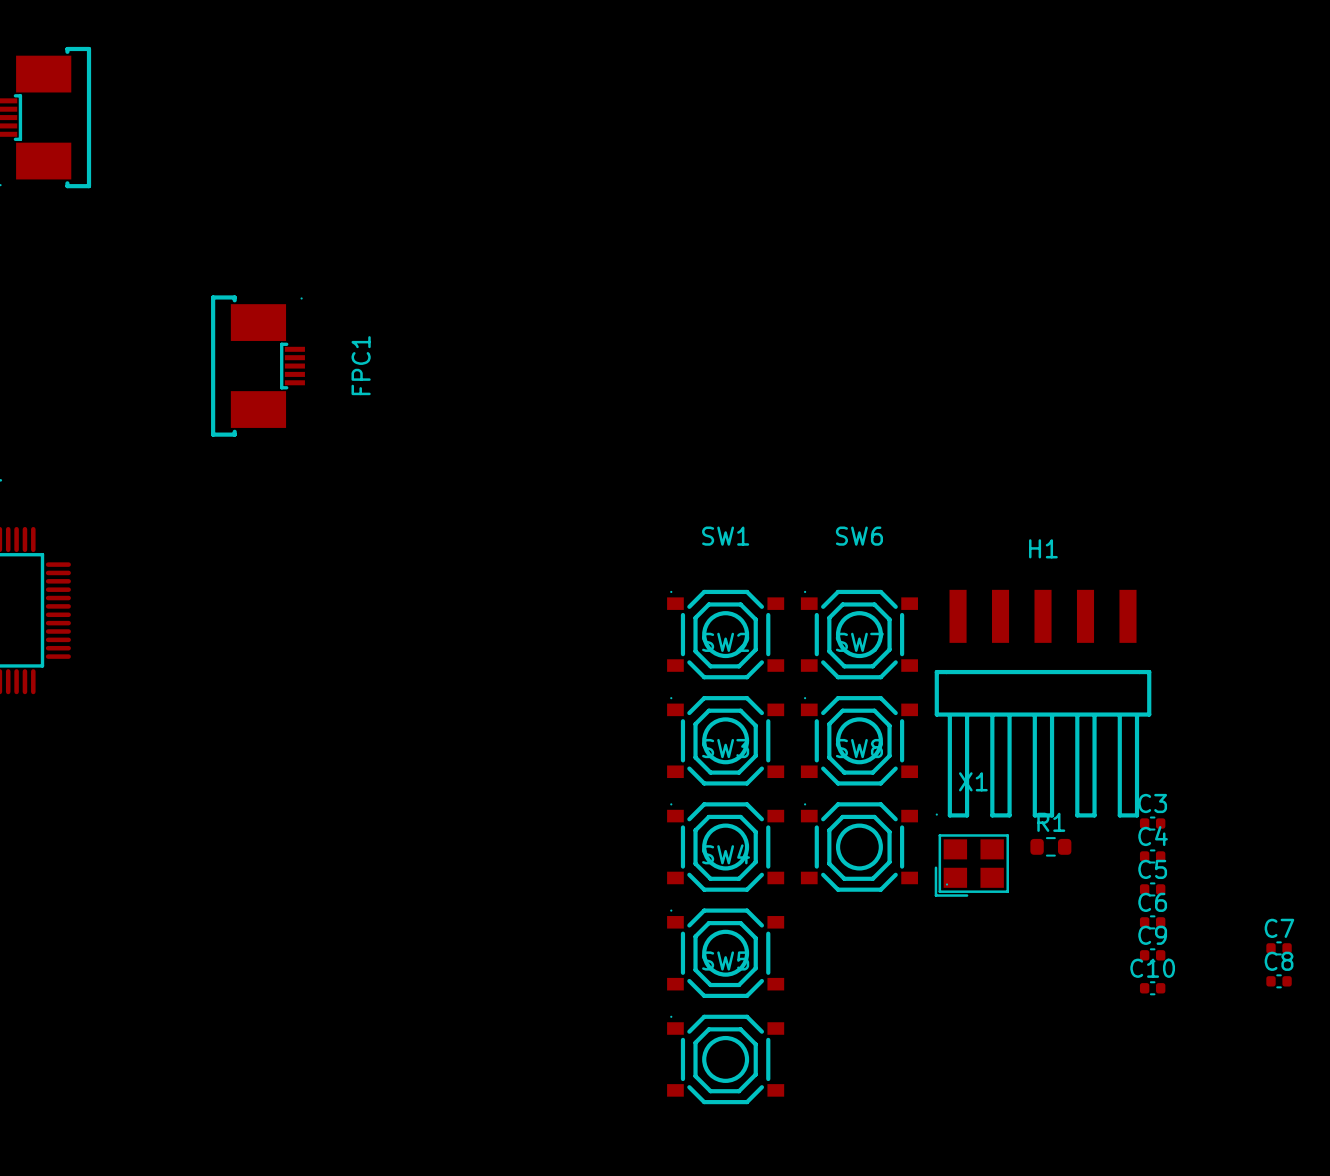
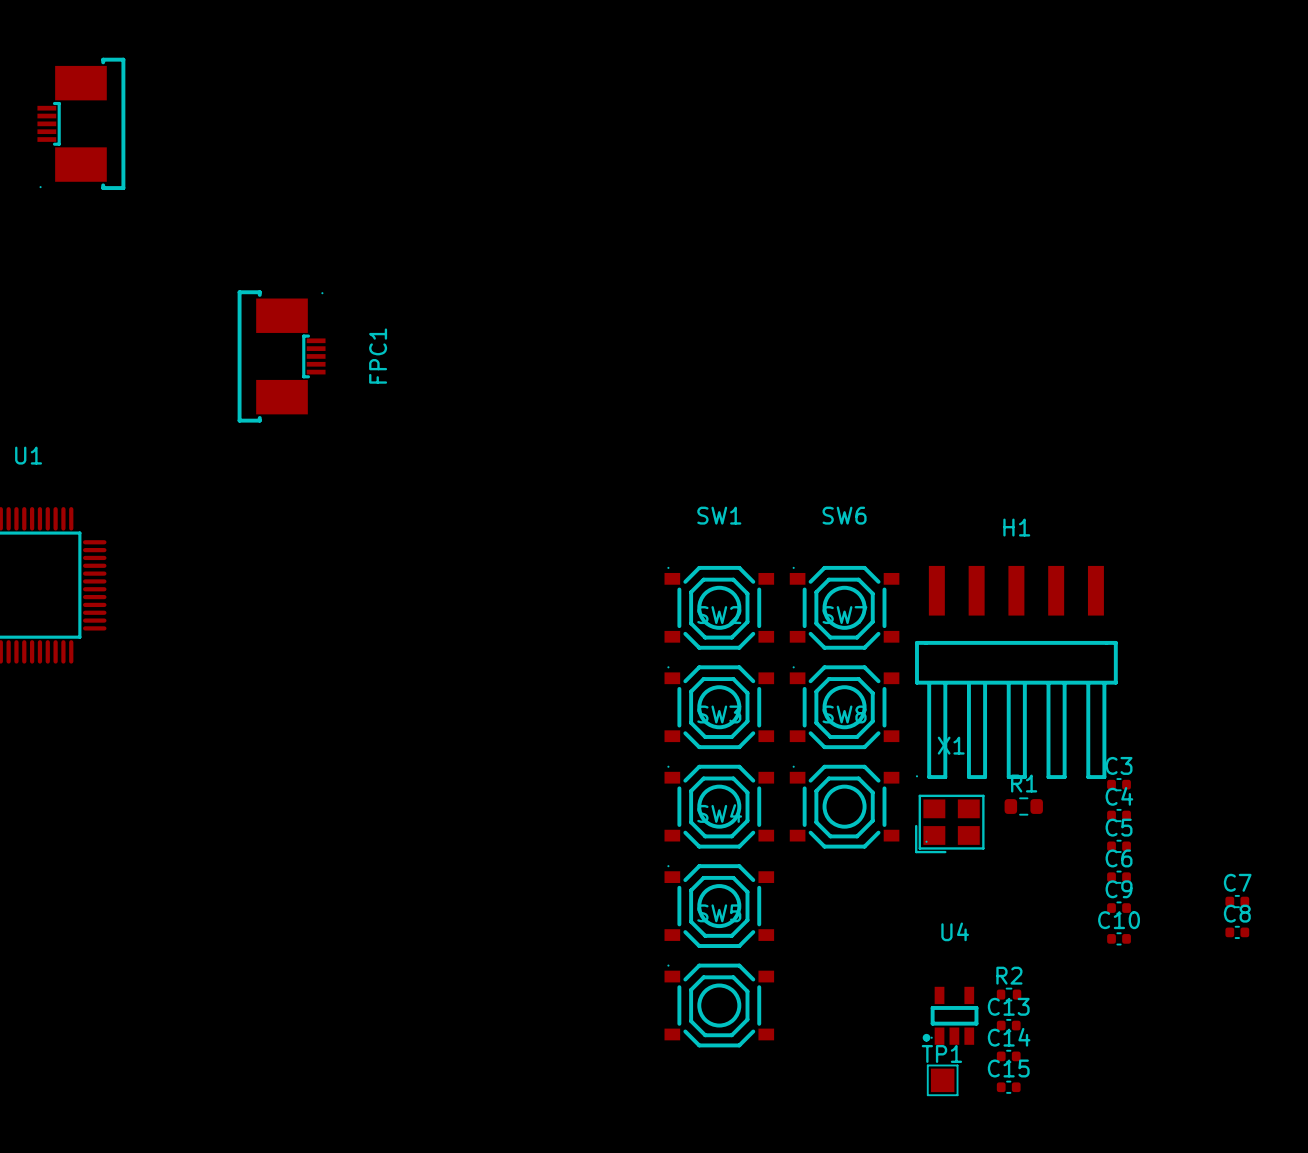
R2: none -> (1009, 994)
U4: none -> (950, 1015)
C13: none -> (1008, 1025)
C14: none -> (1008, 1056)
TP1: none -> (942, 1080)
C15: none -> (1008, 1087)

